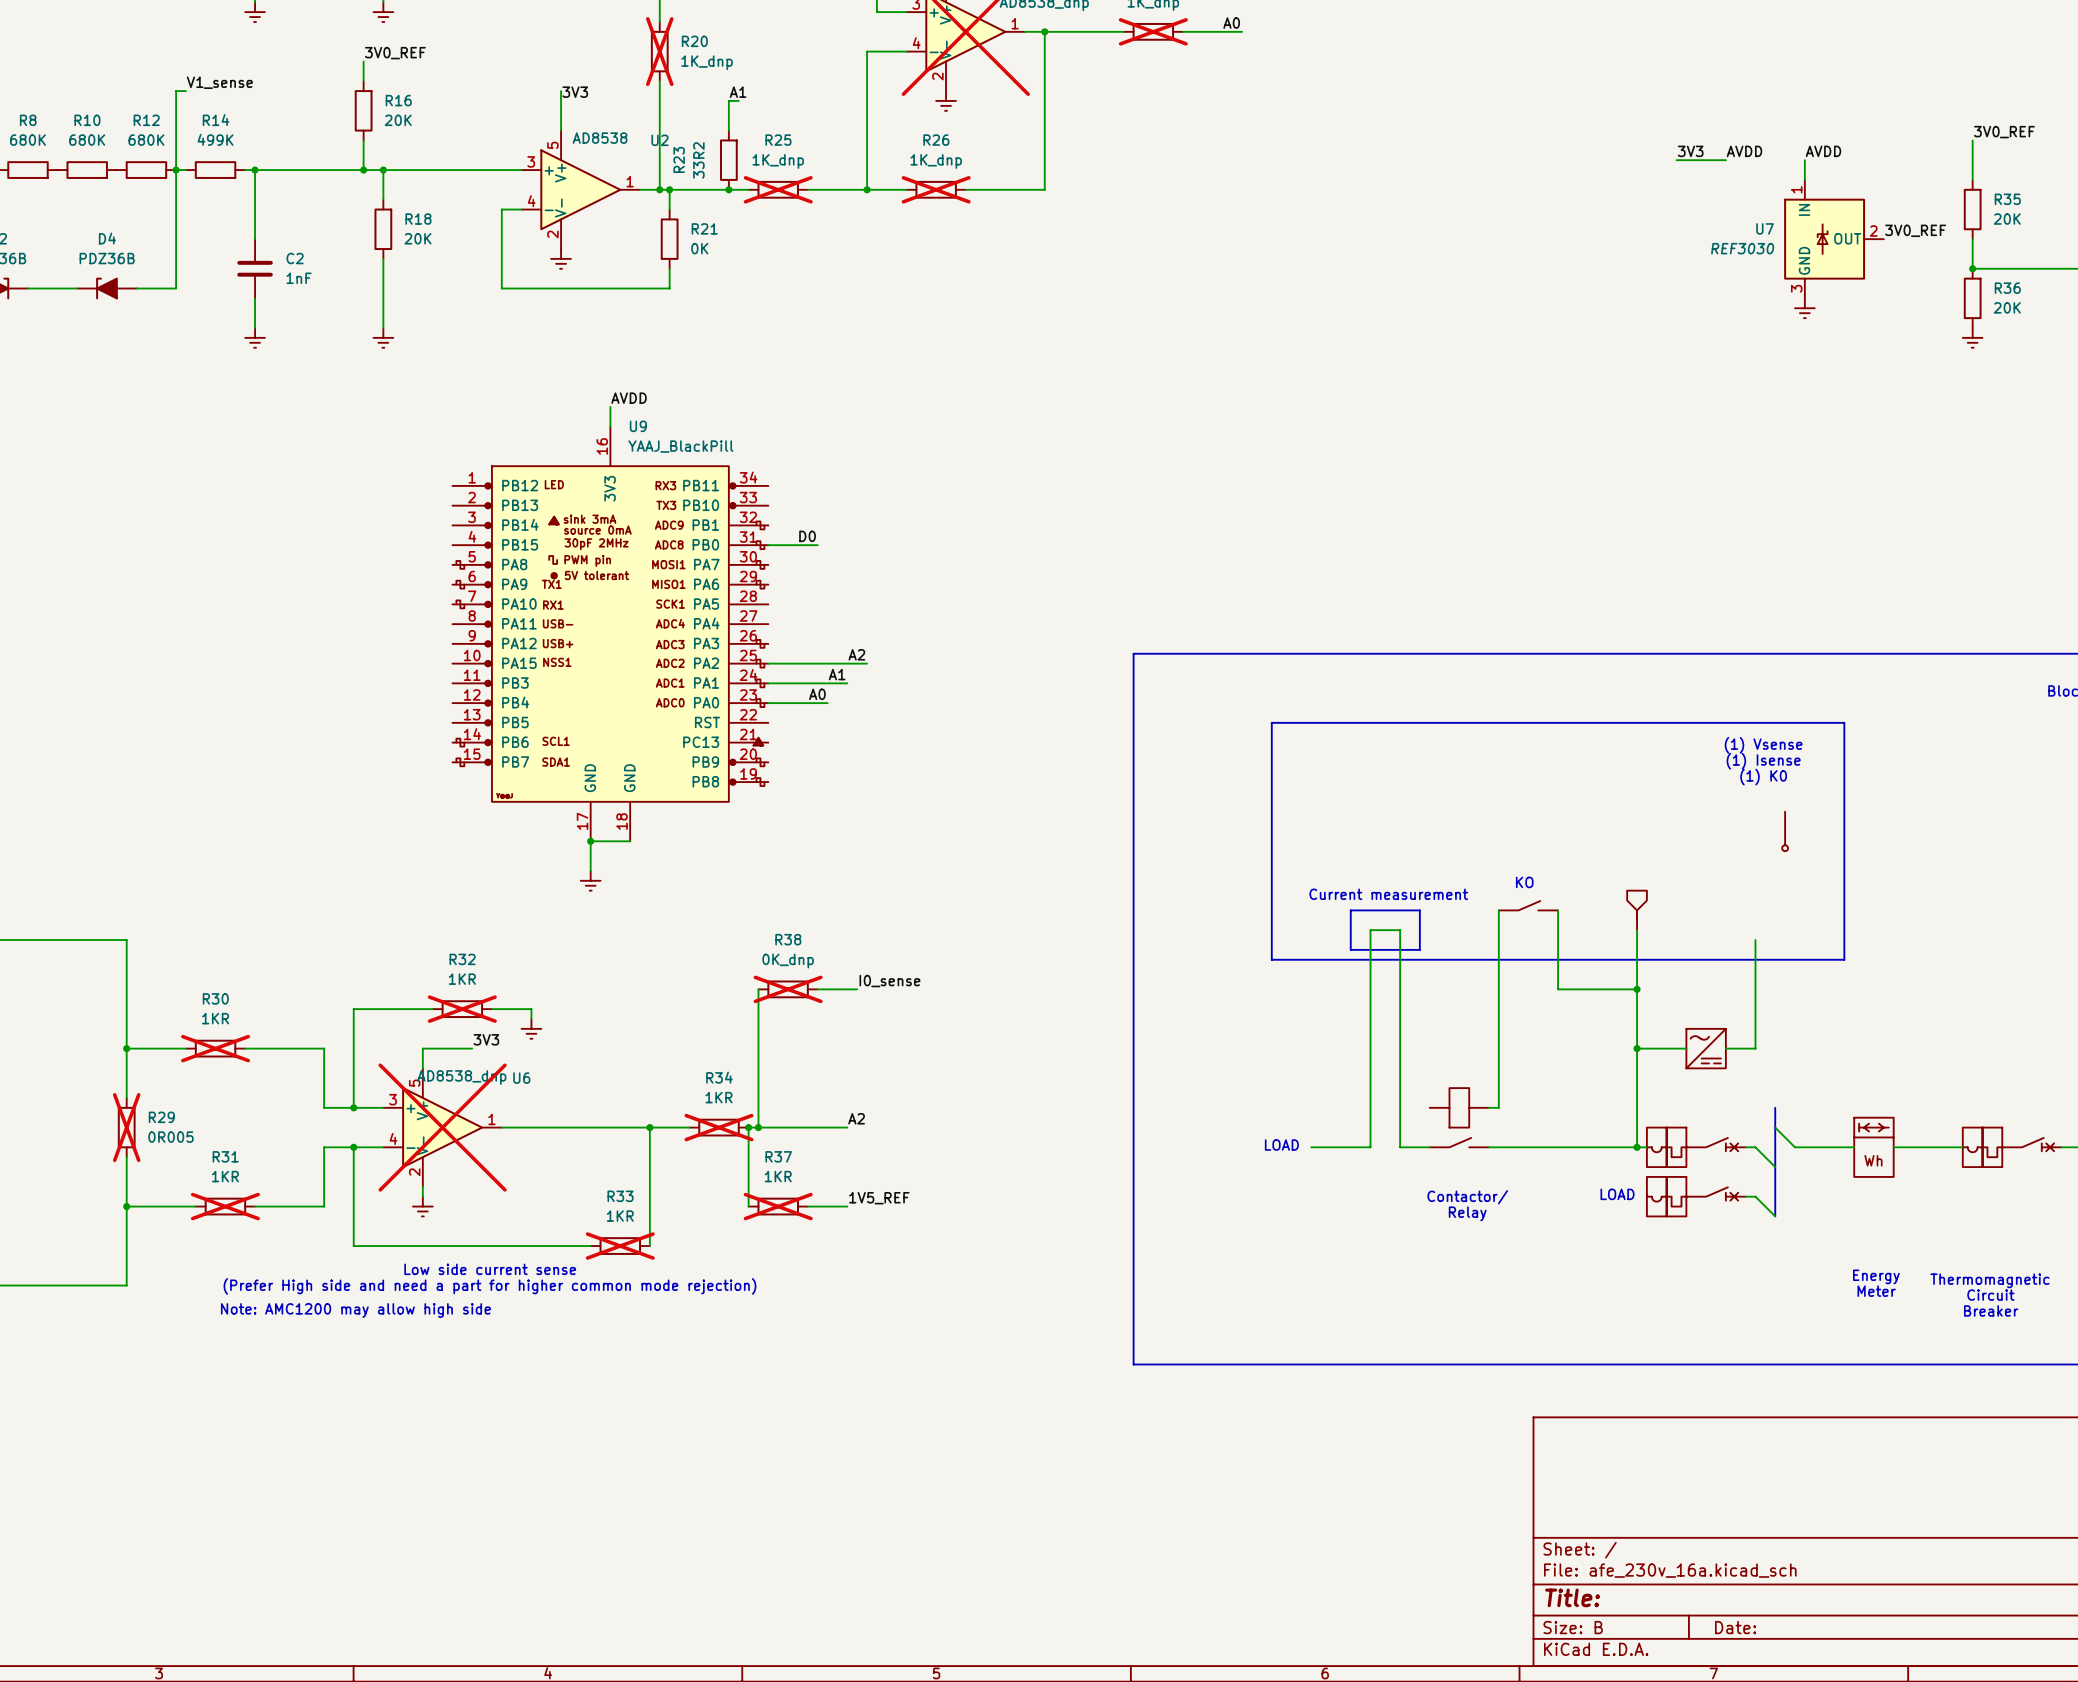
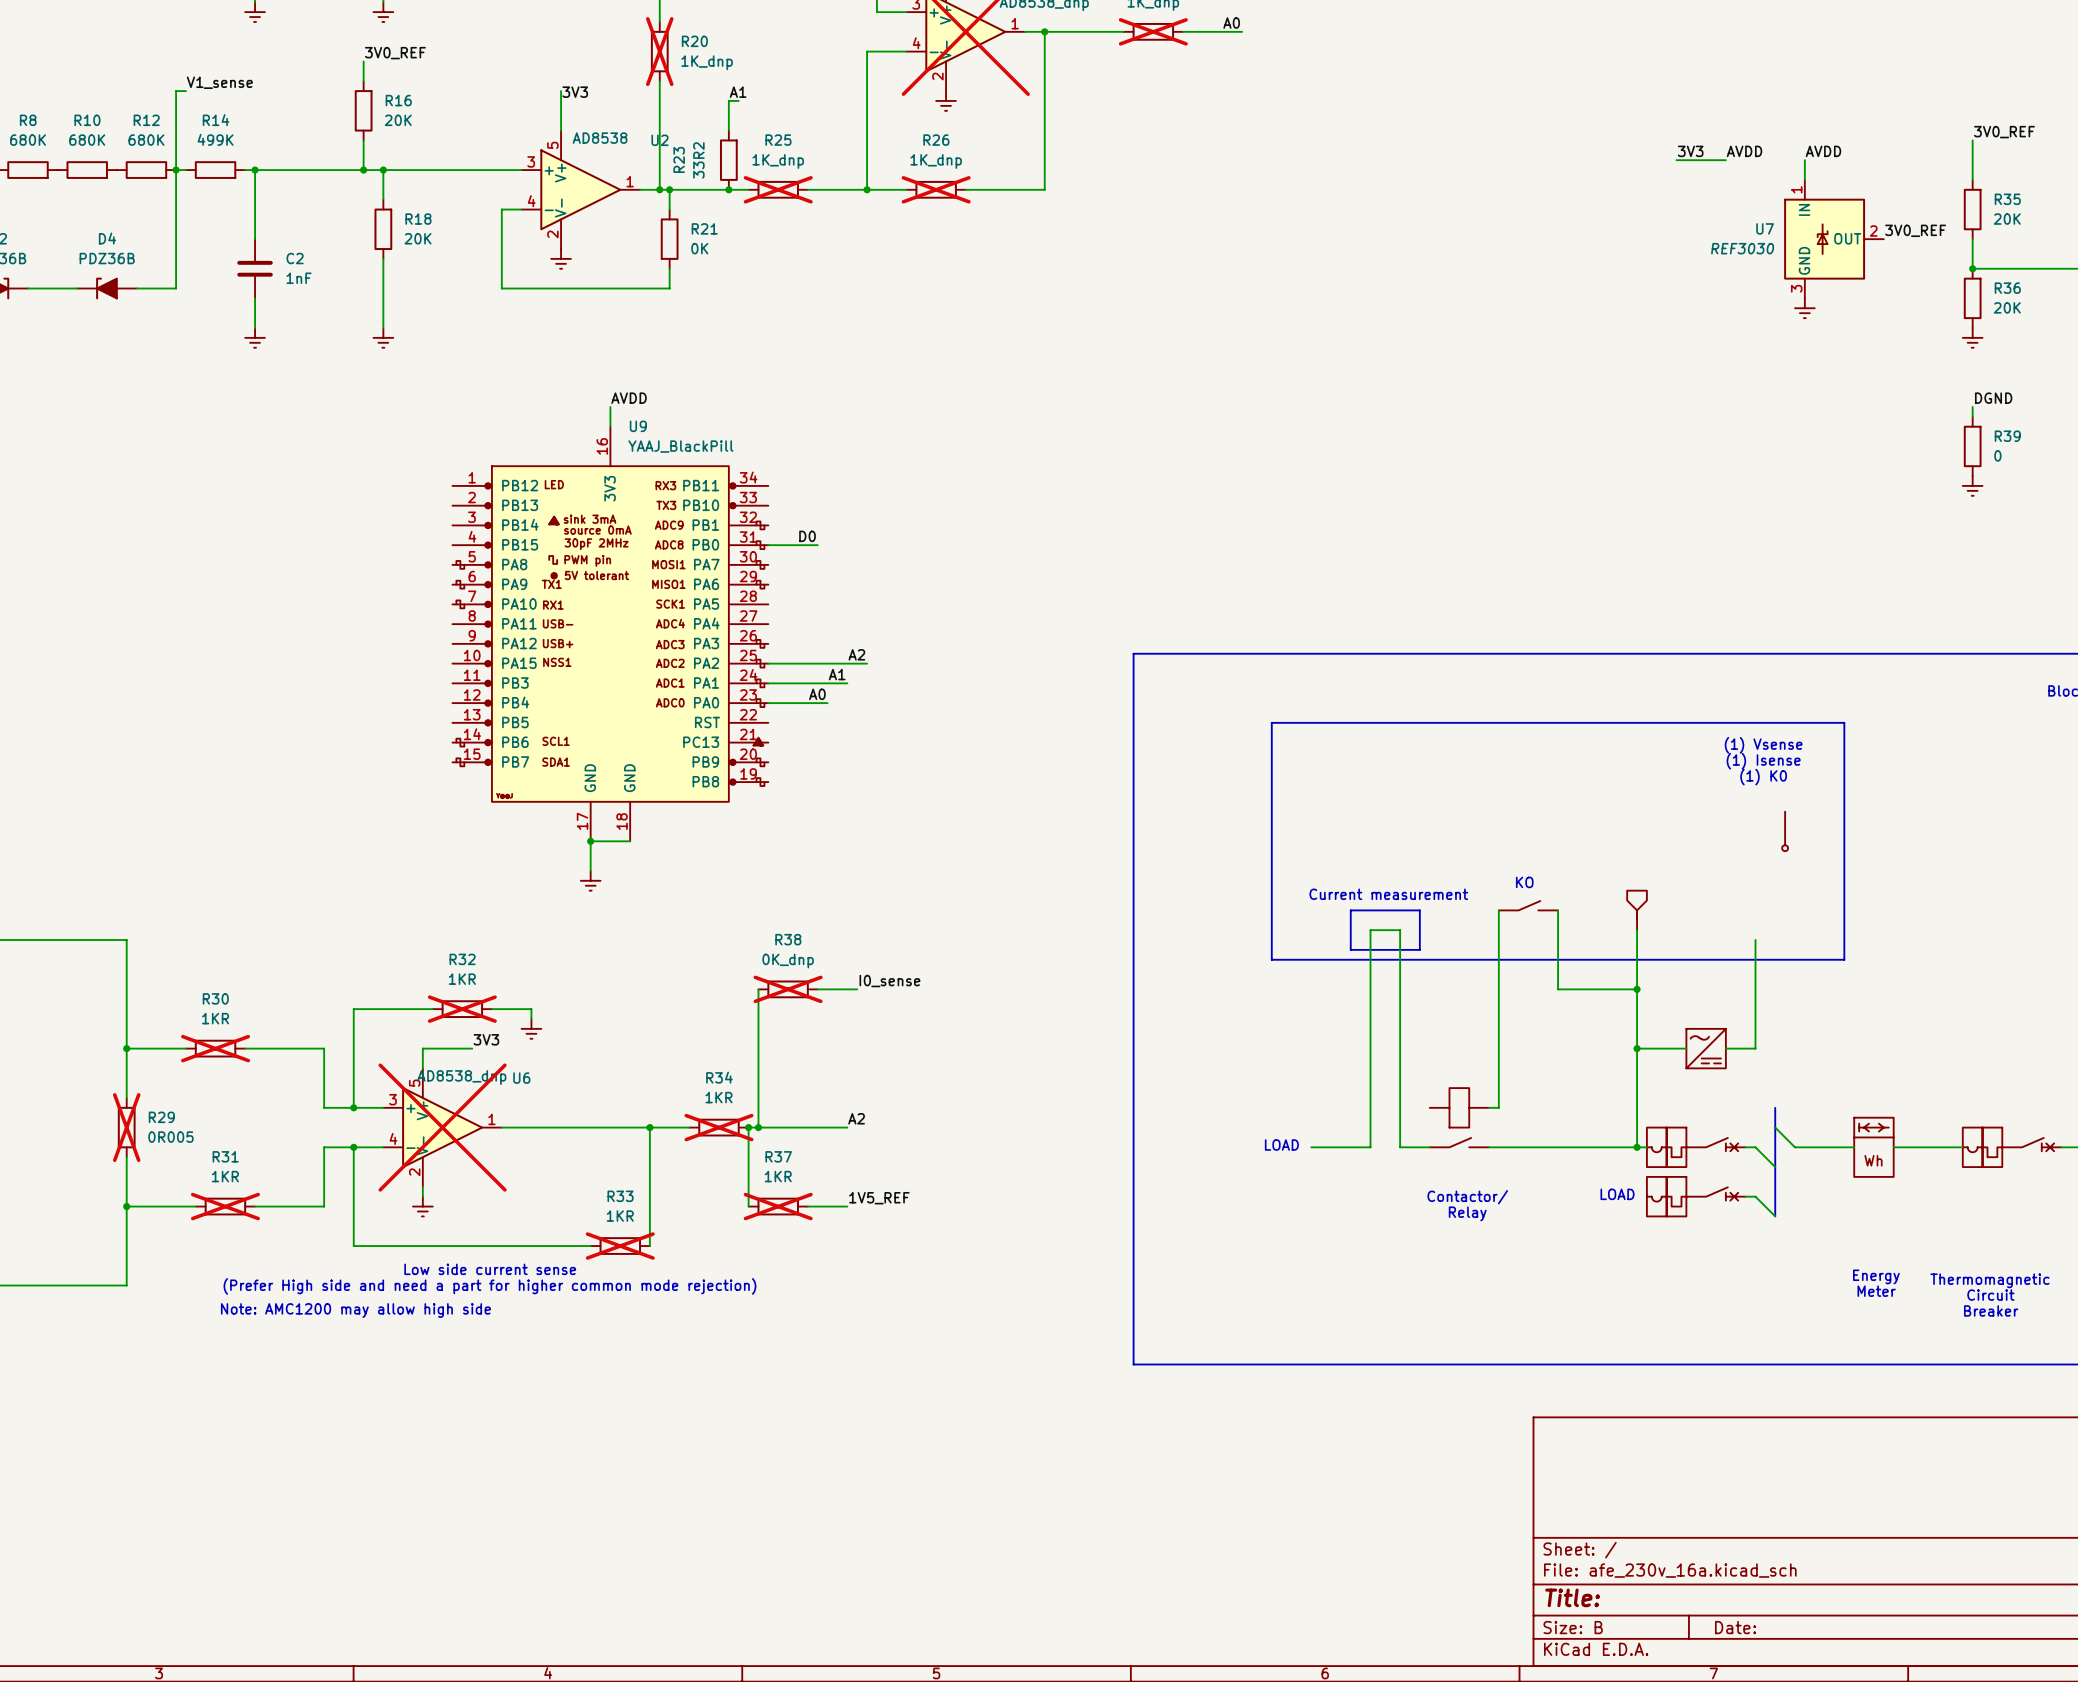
label: none -> DGND (1993, 398)
wire: none -> (1972, 406) (1972, 416)
R39: none -> 0 (1972, 446)
power symbol: none -> (1972, 485)

